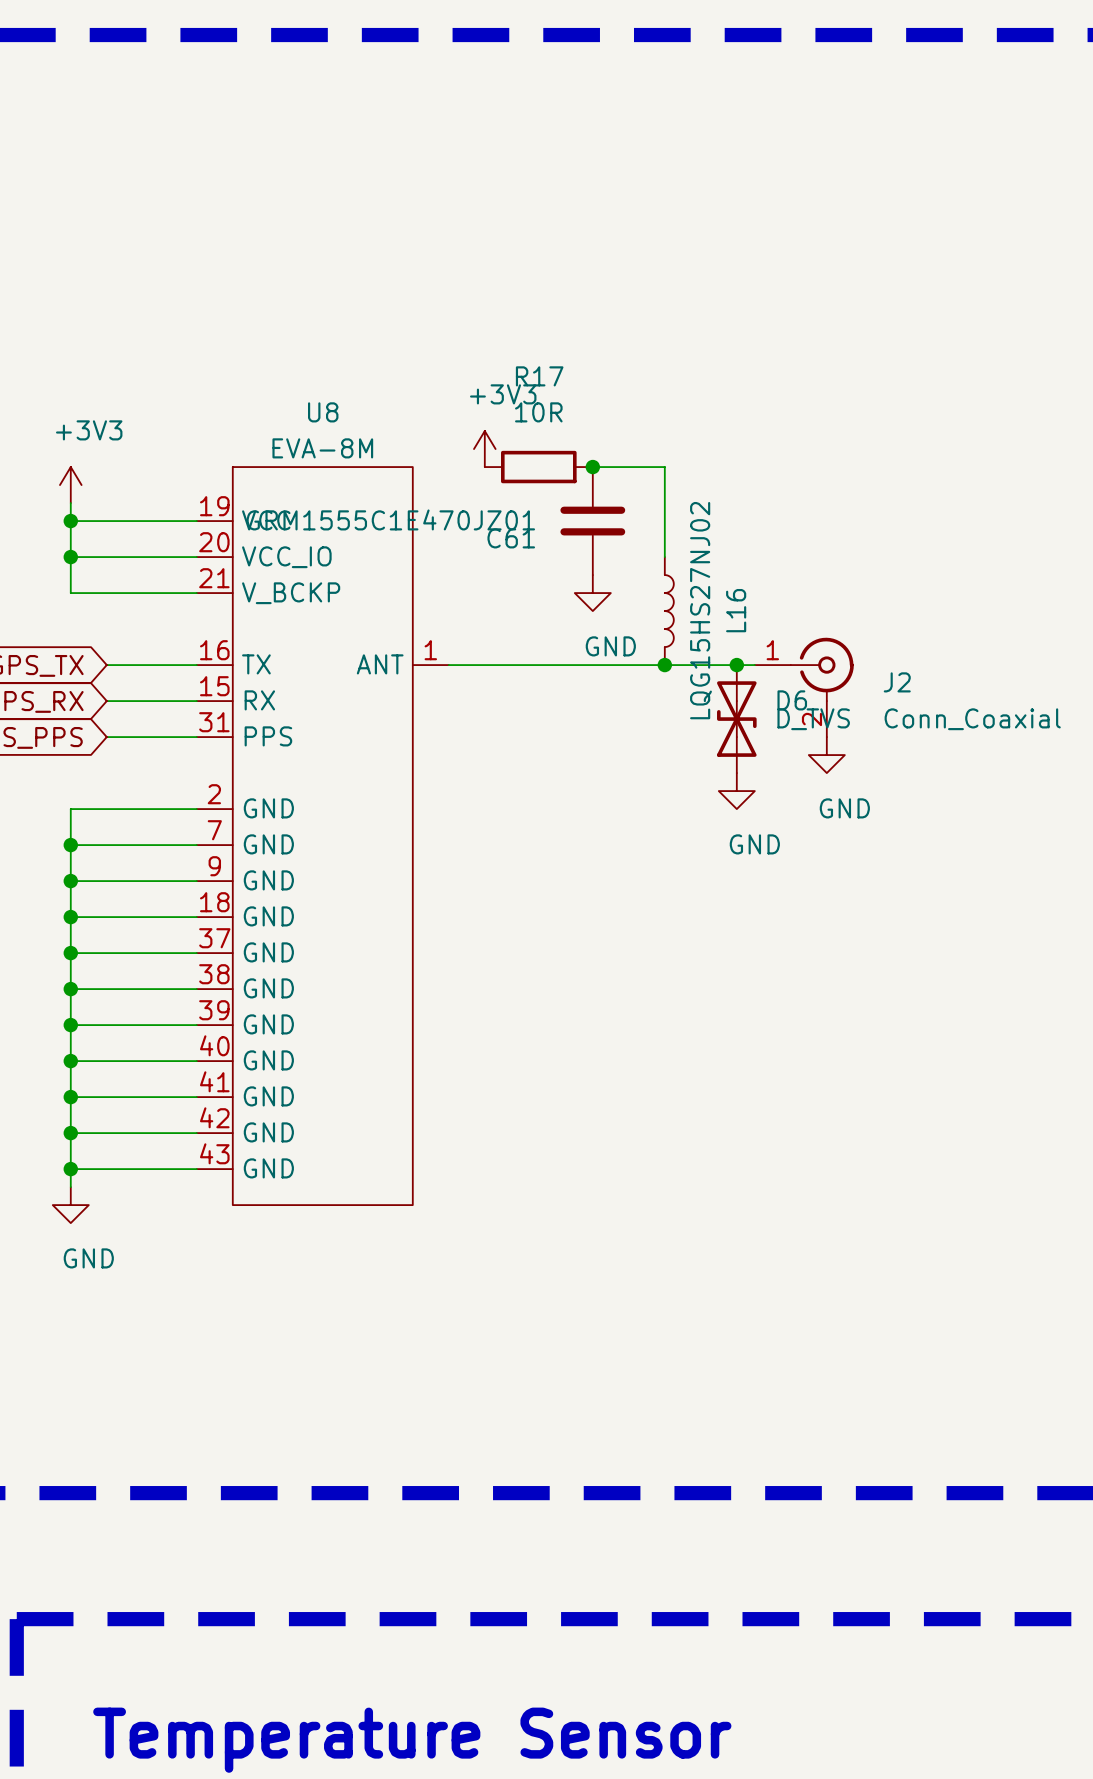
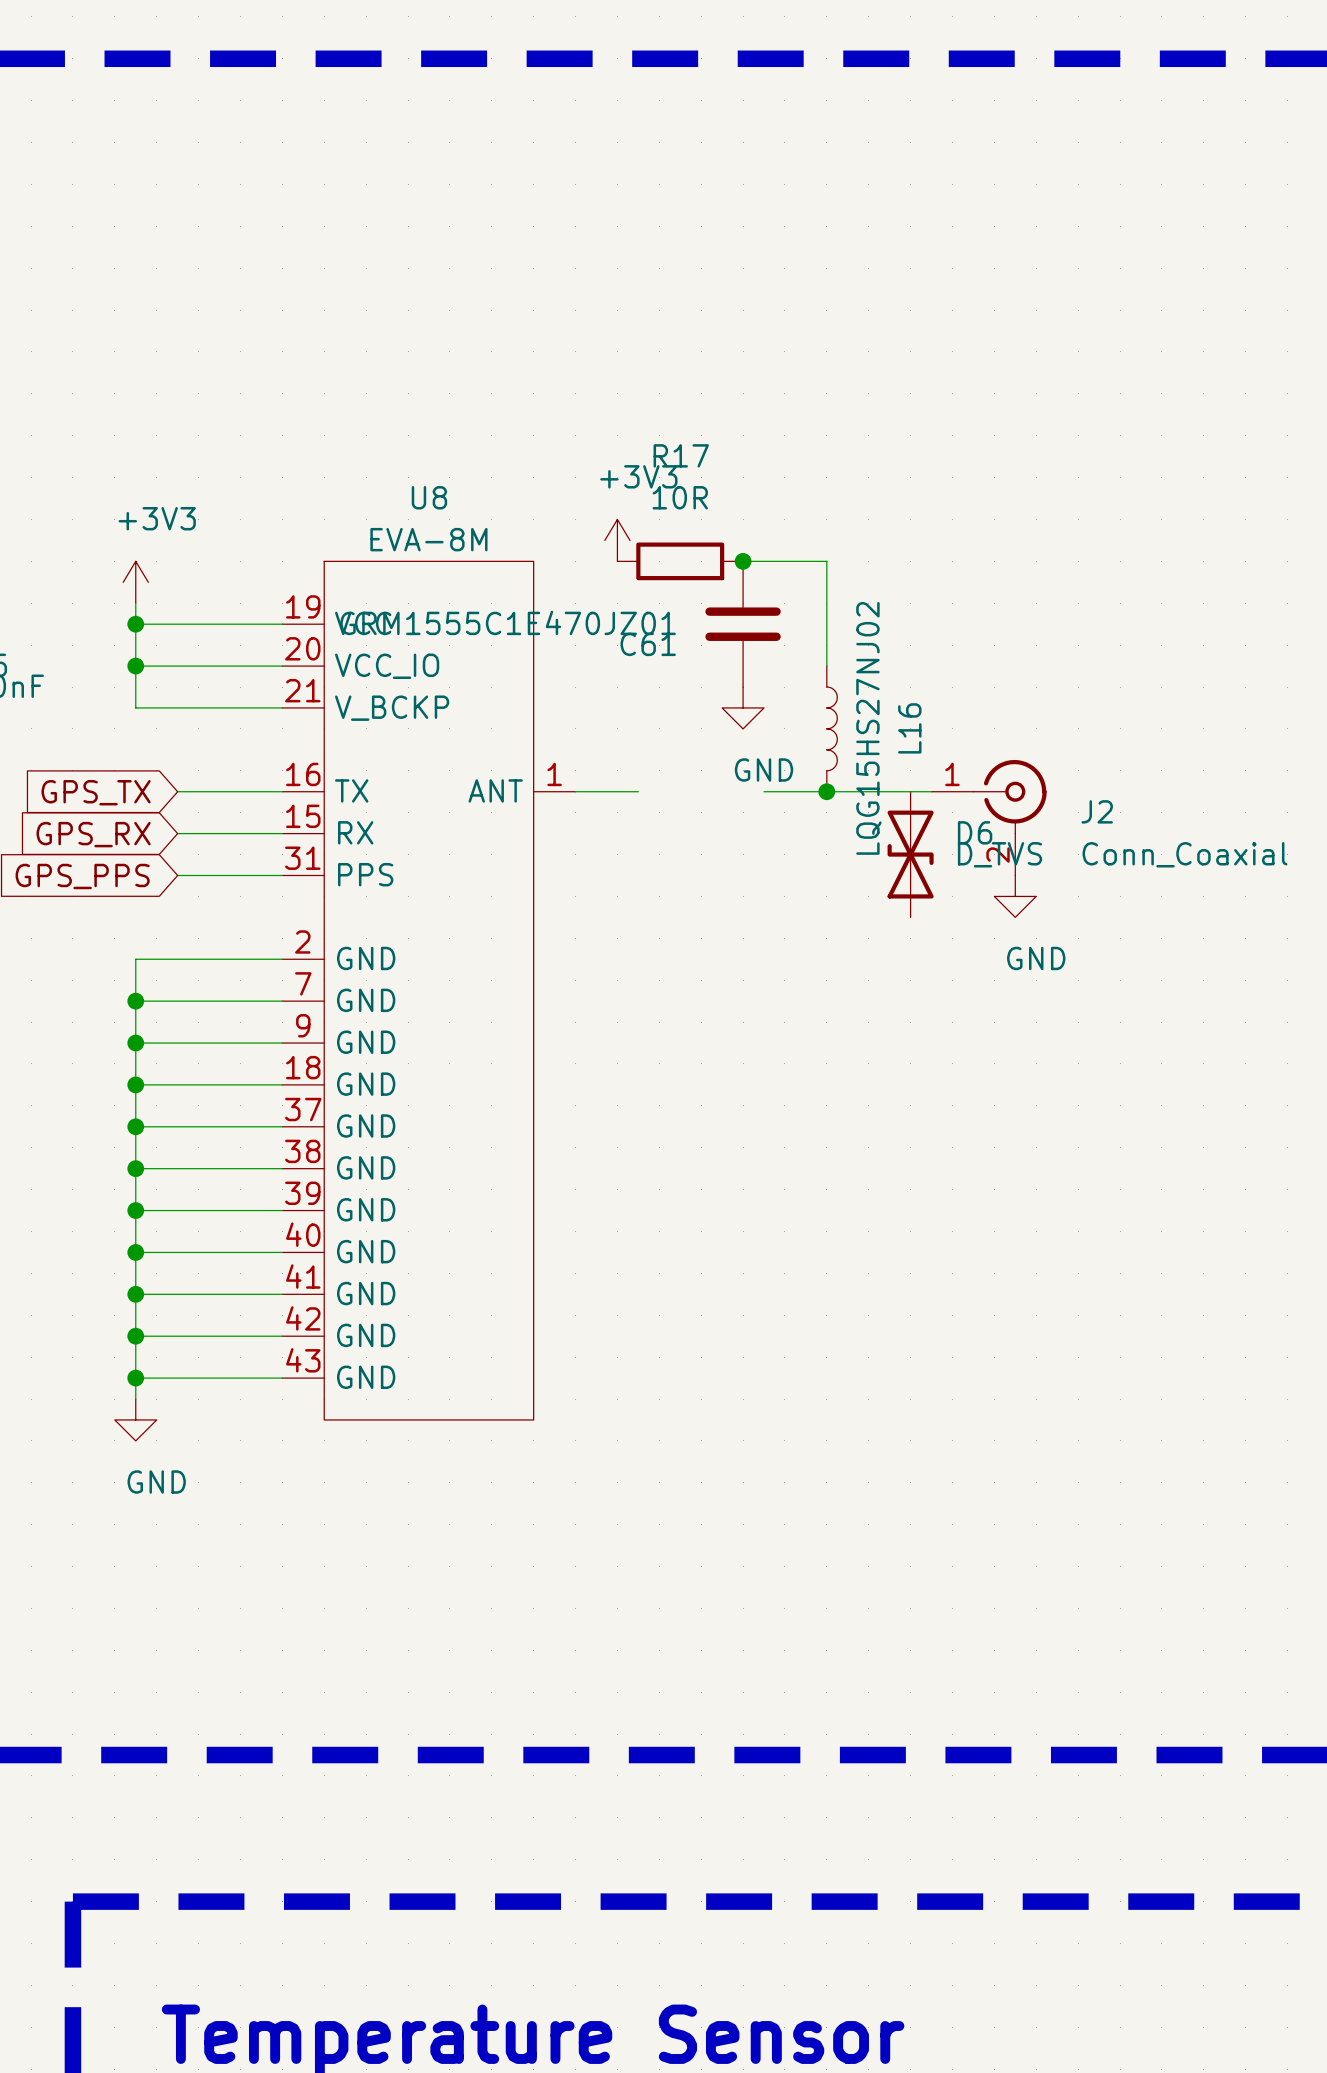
wire: (502, 665) (610, 665) -> none
junction: (736, 665) -> none
power symbol: GND (736, 791) -> none

